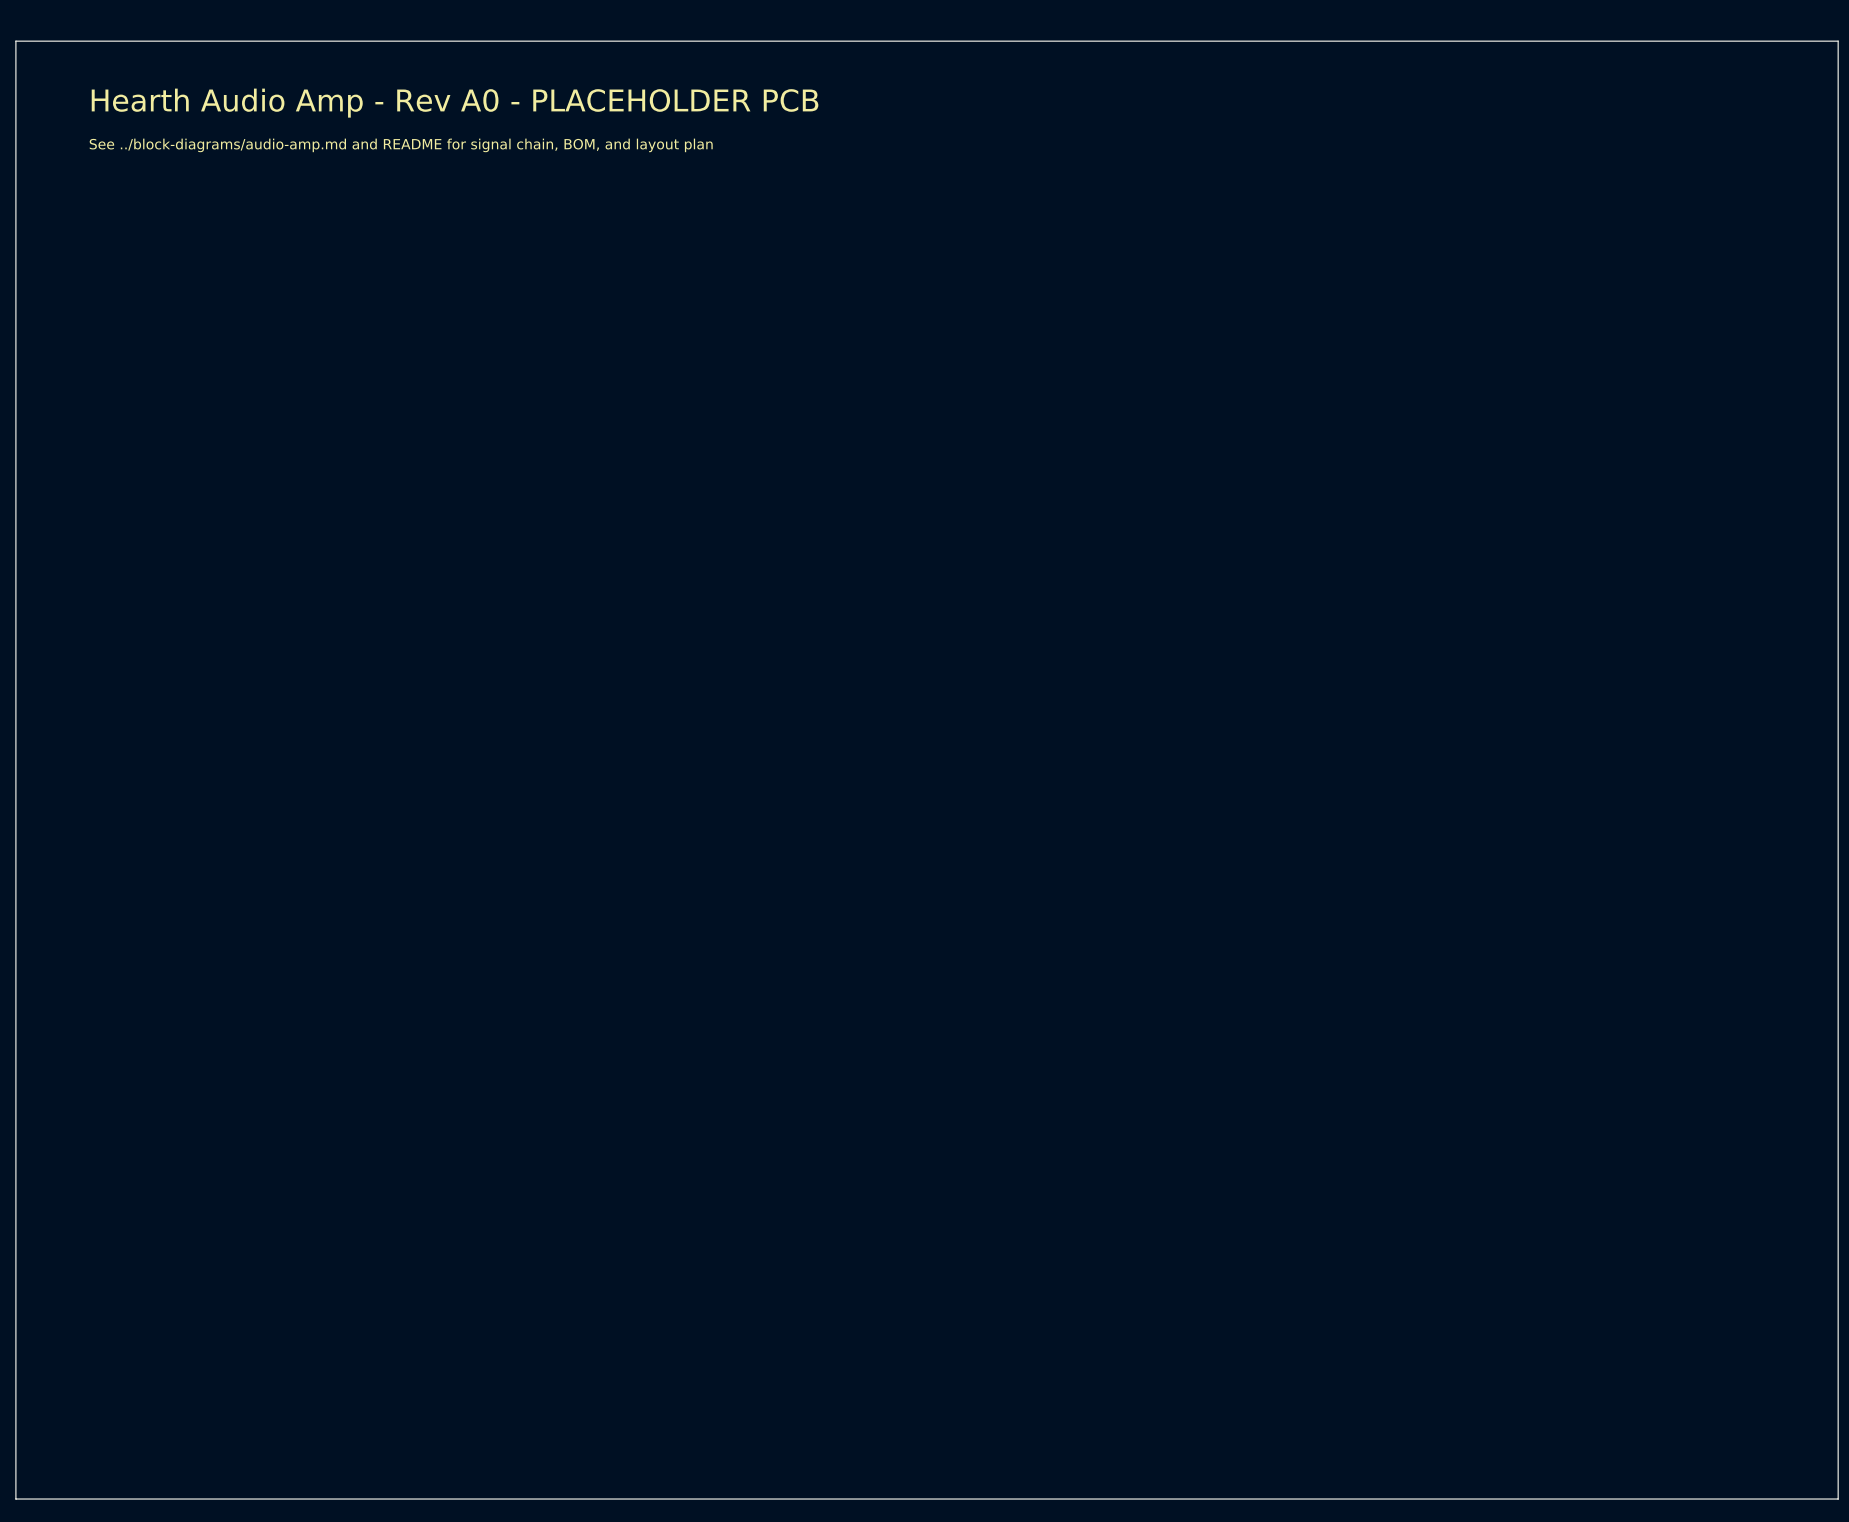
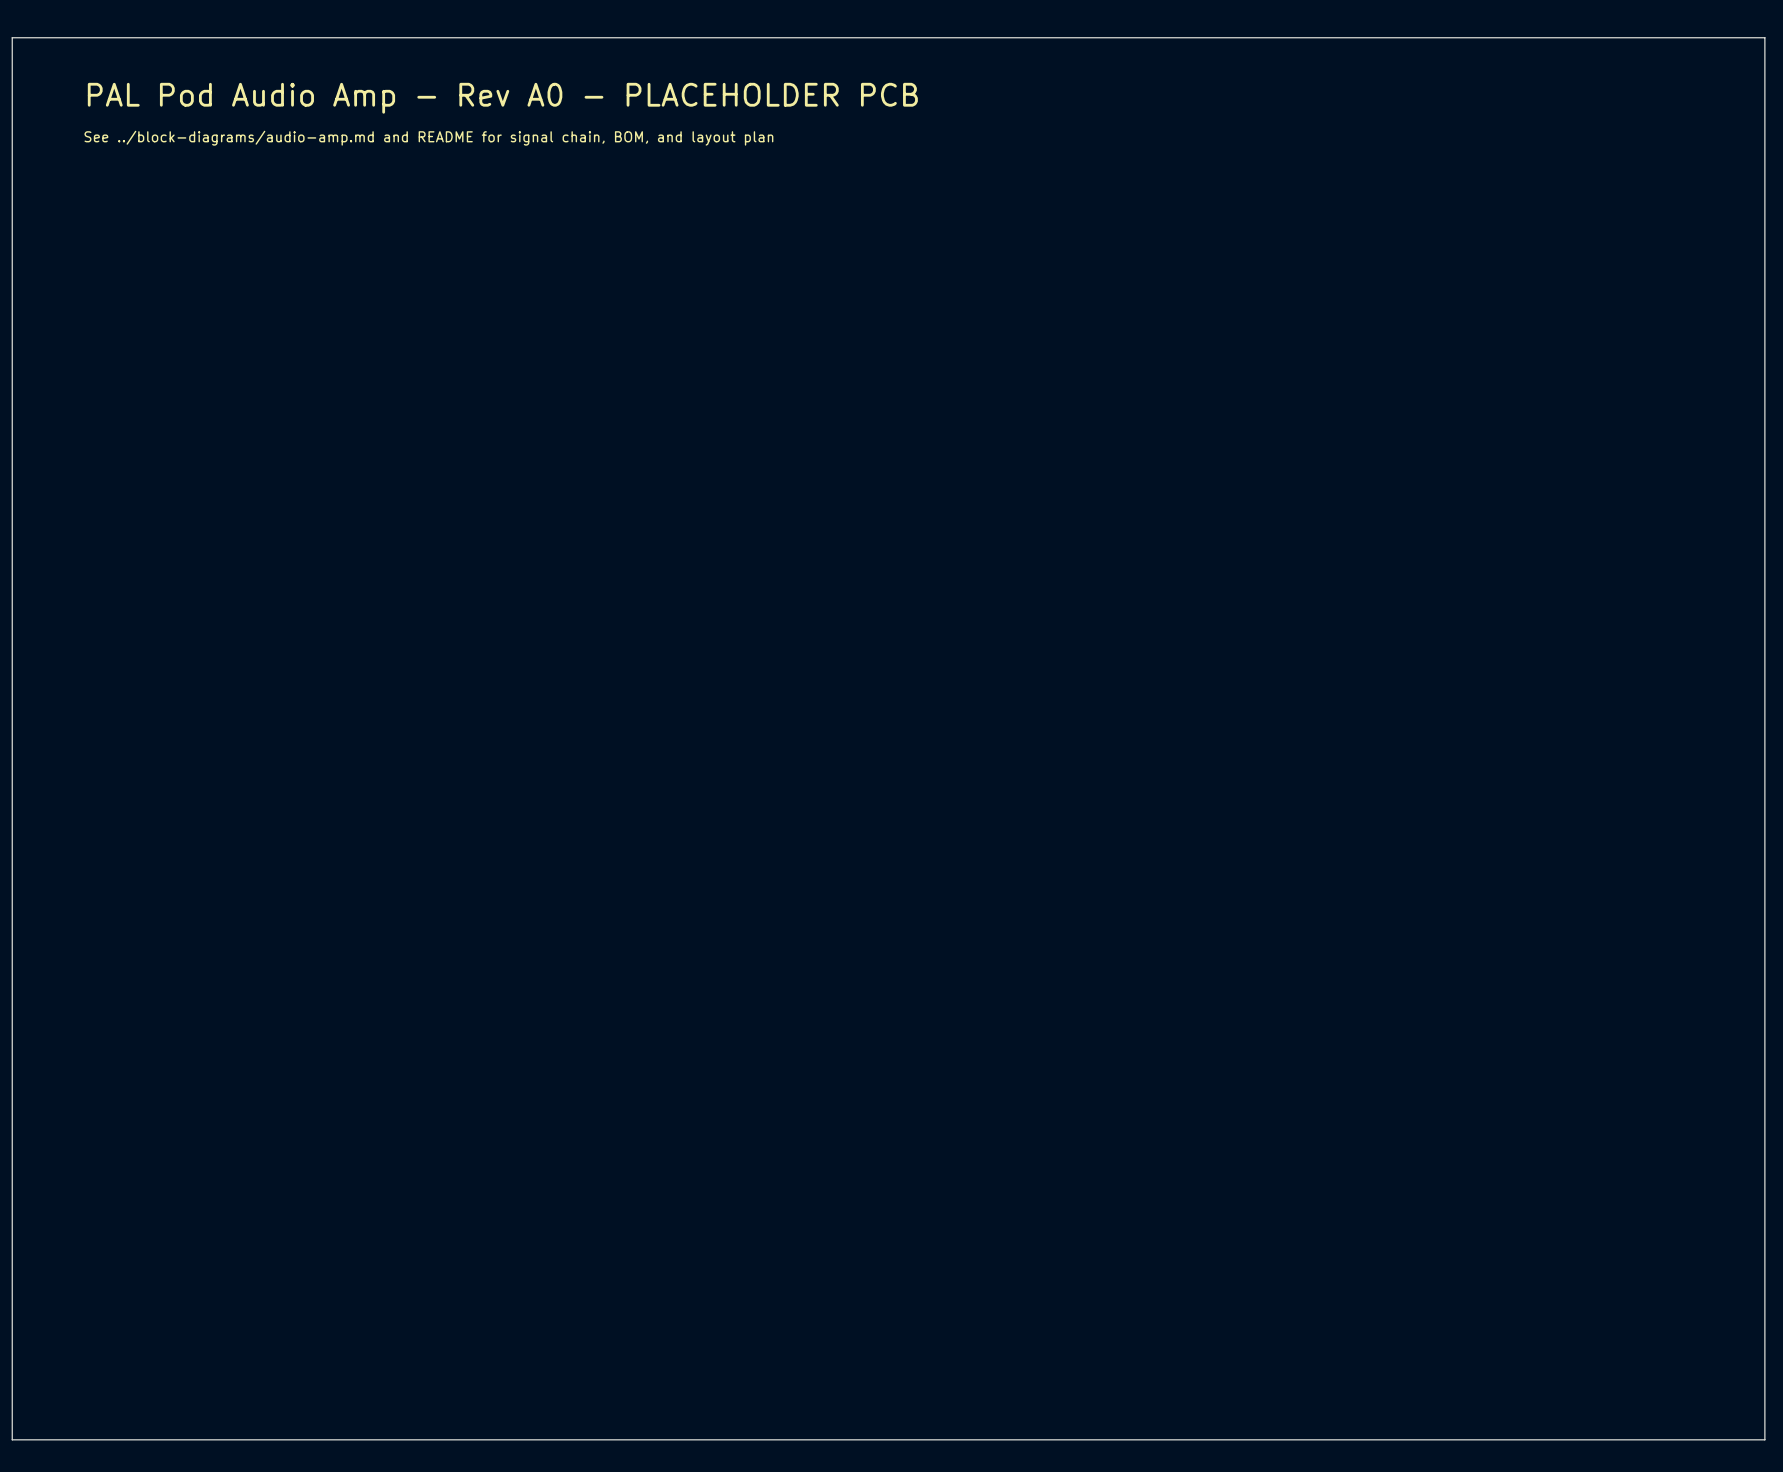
text: Hearth Audio Amp - Rev A0 - PLACEHOLDER PCB (455, 103) -> PAL Pod Audio Amp - Rev A0 - PLACEHOLDER PCB (502, 98)

